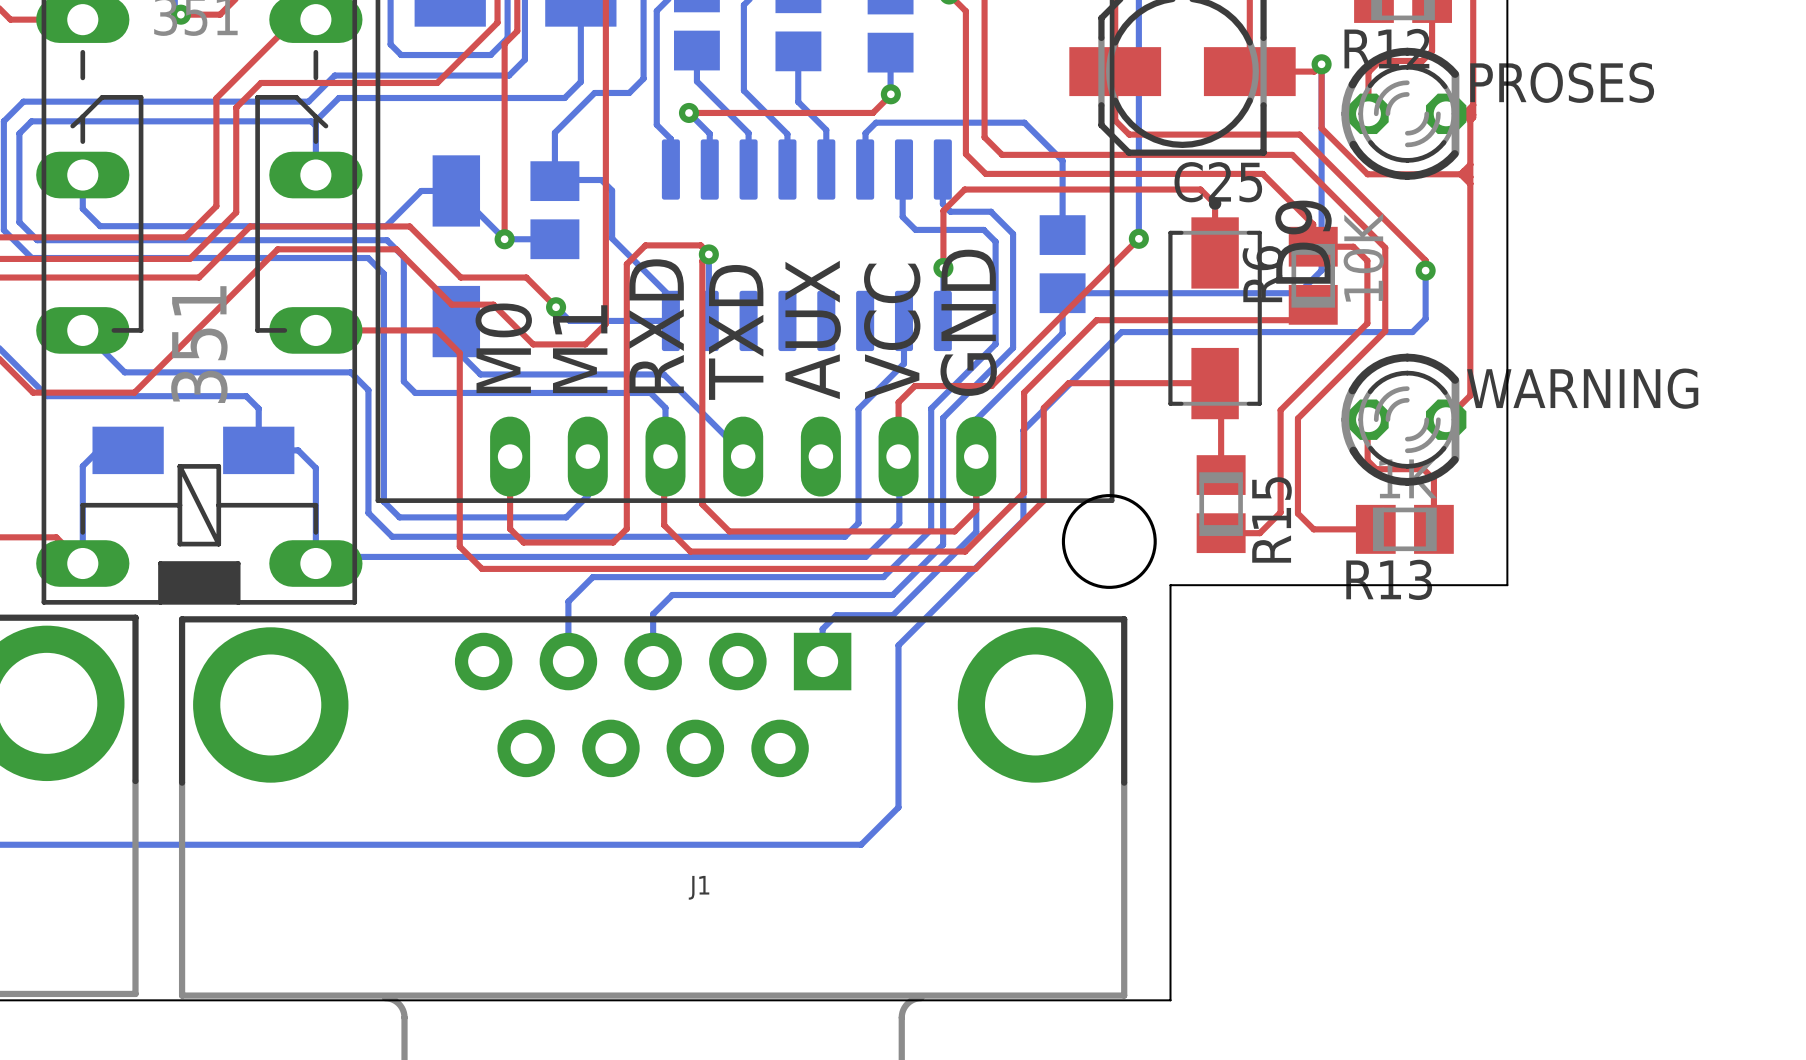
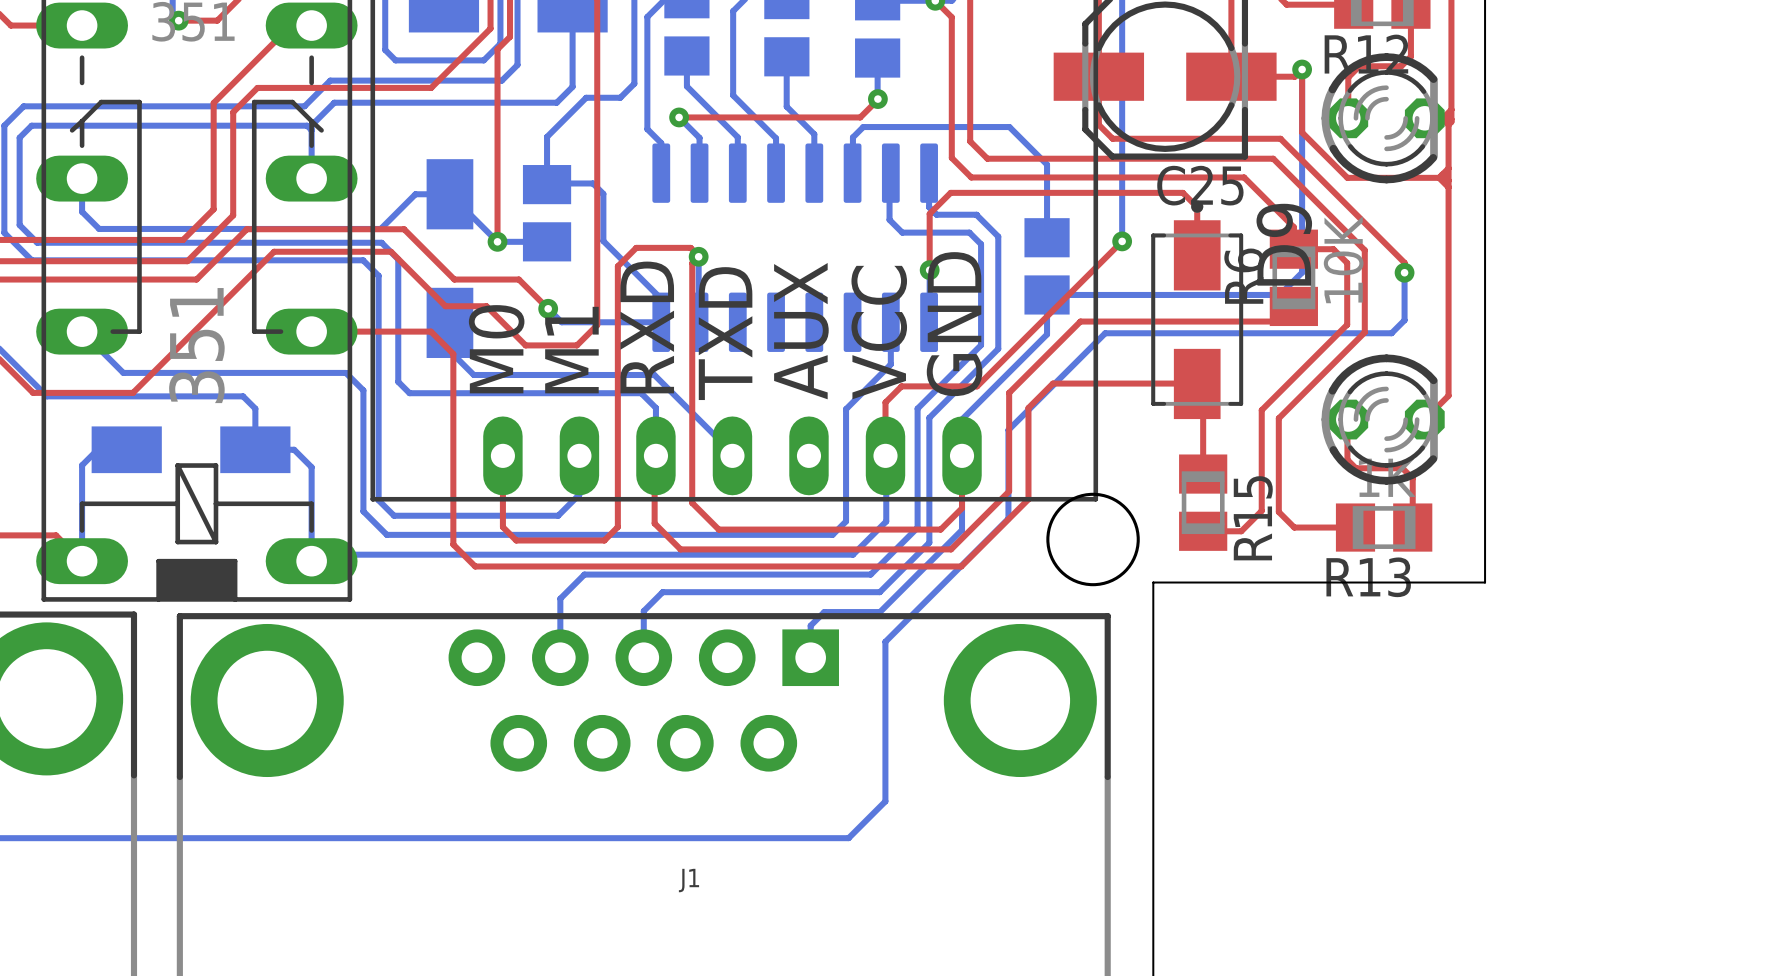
PROSES name: PROSES (1562, 82) -> none
WARNING name: WARNING (1582, 388) -> none

